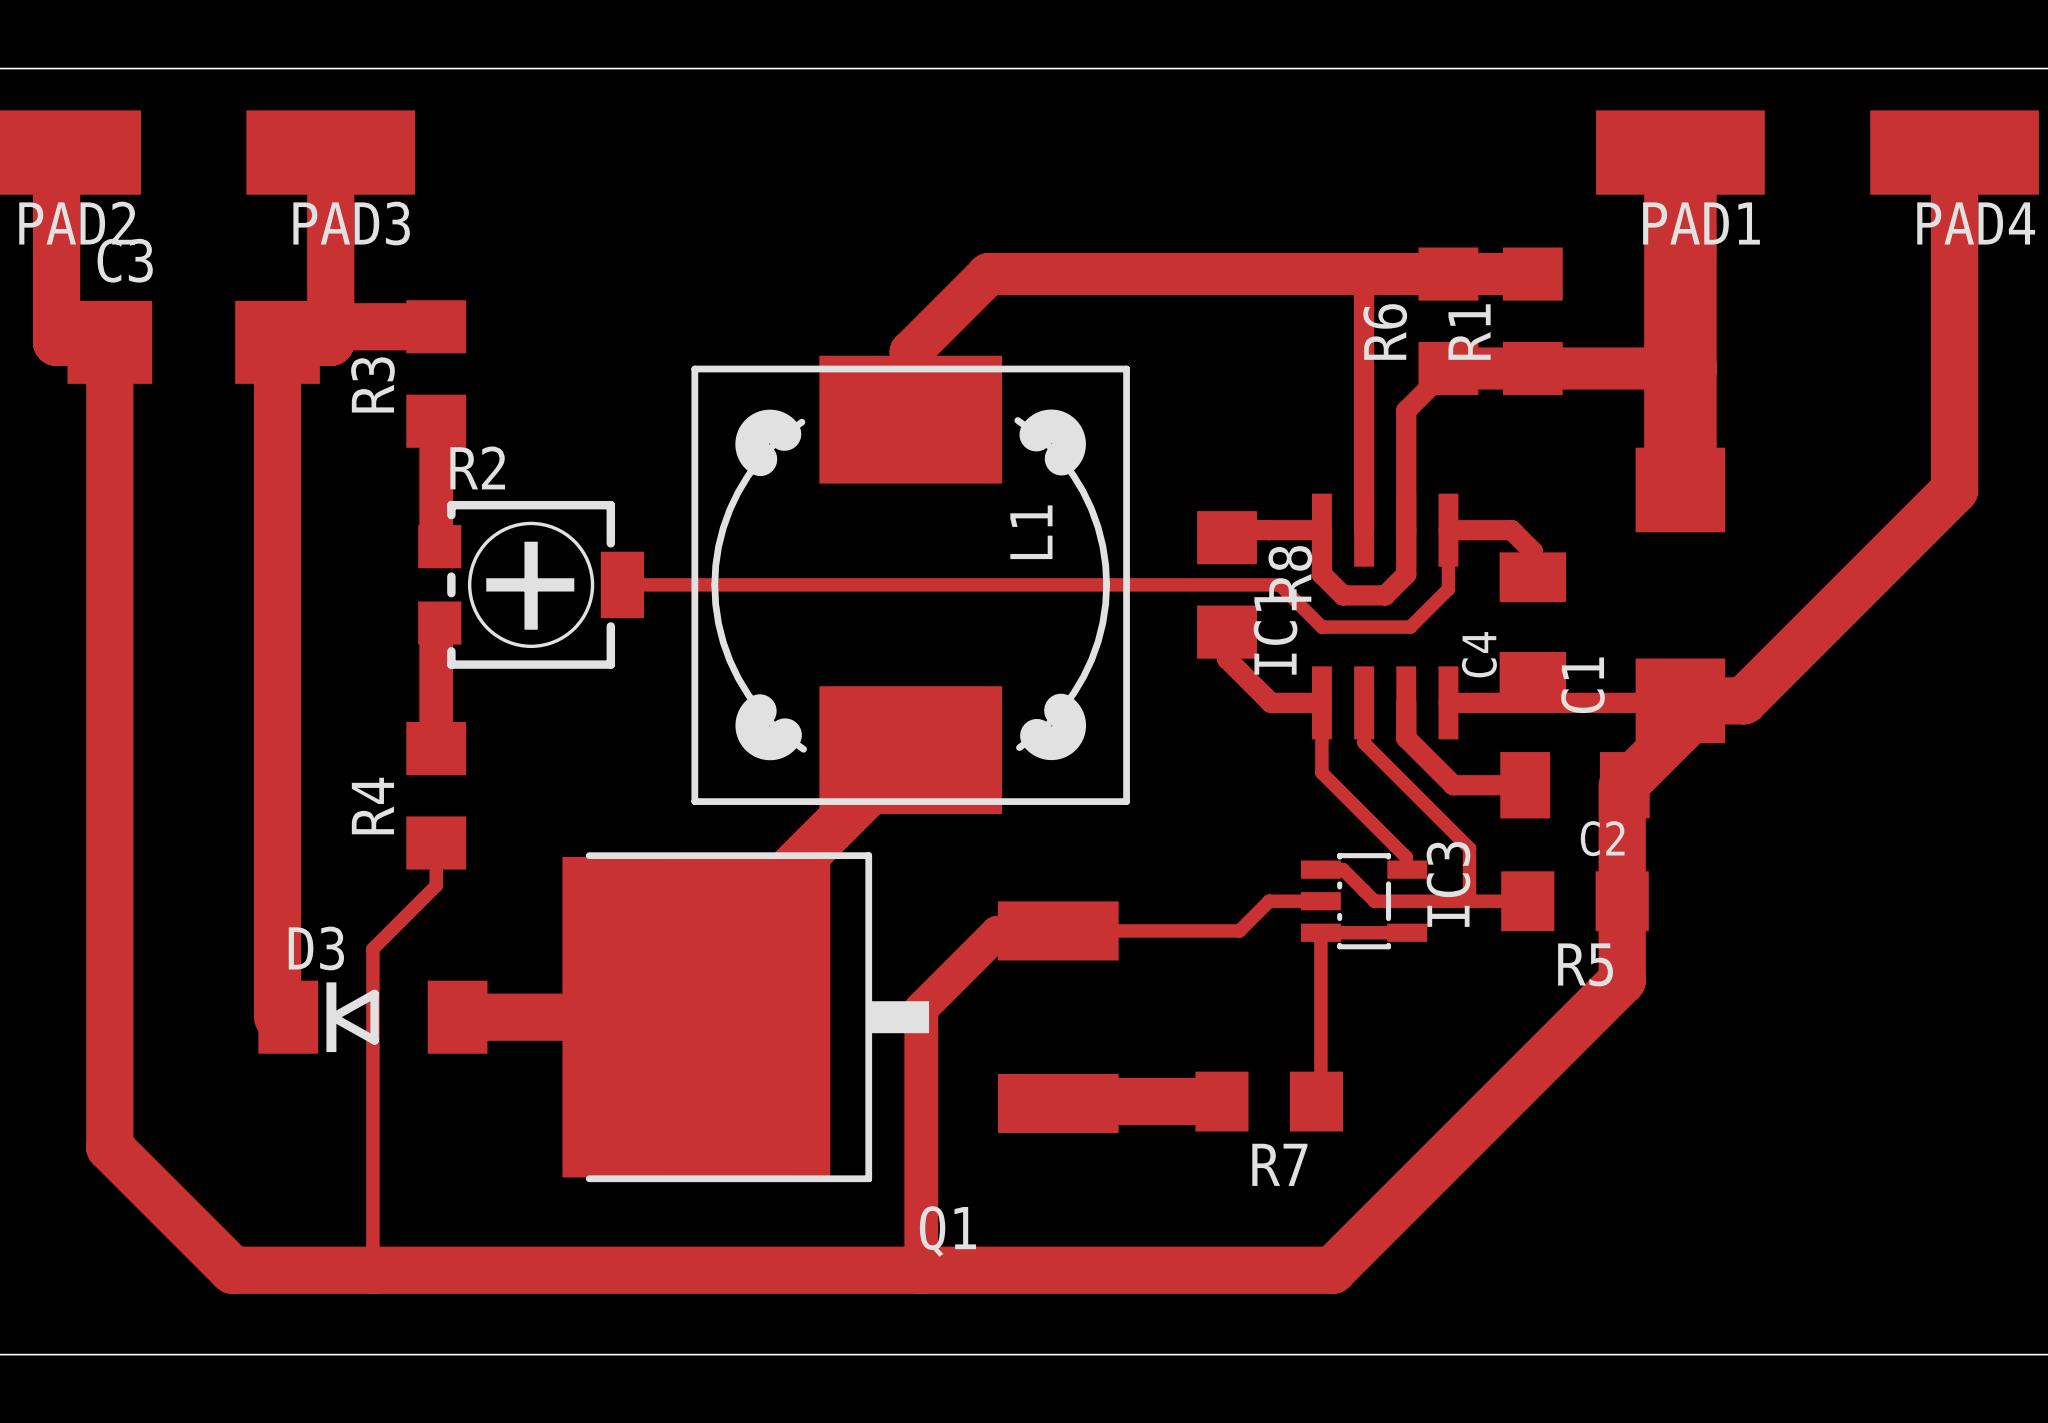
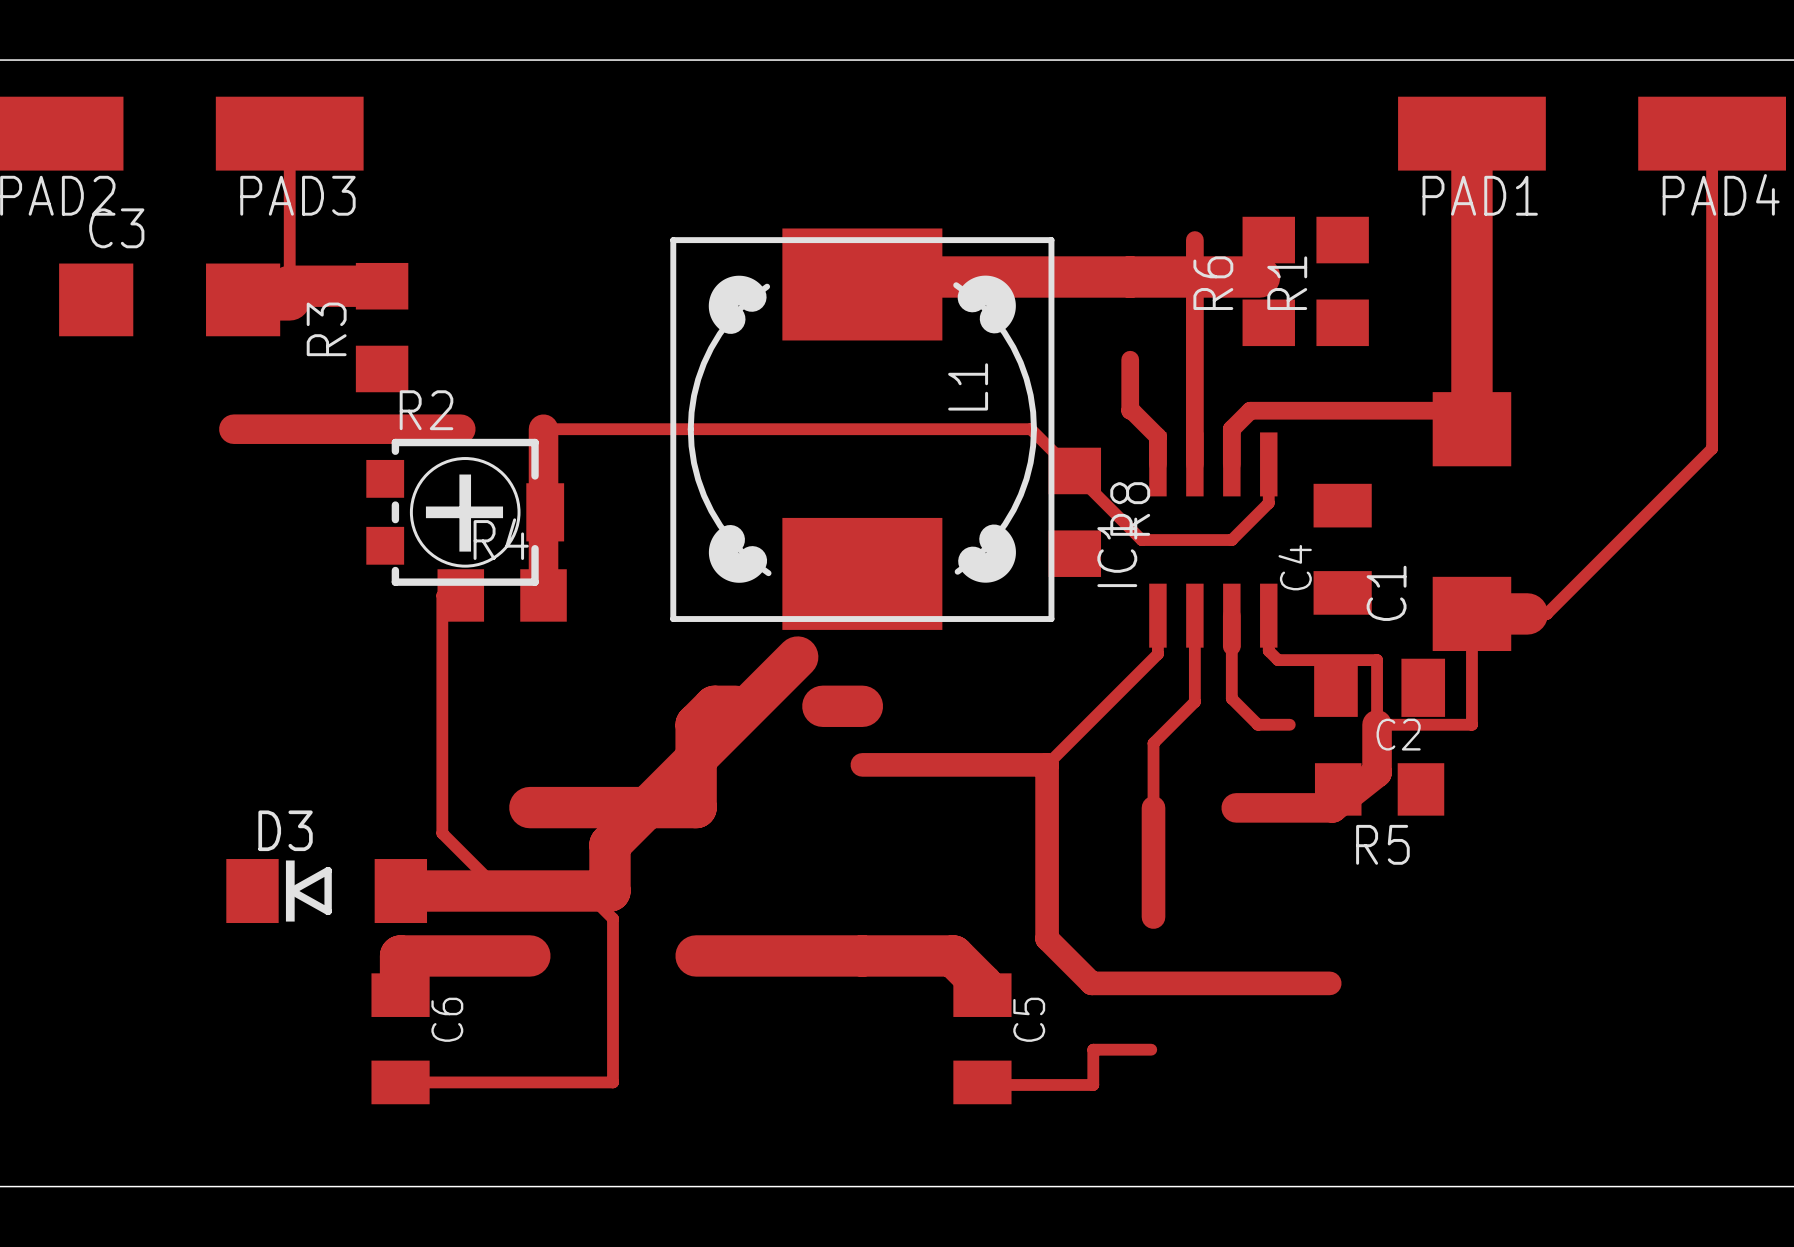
track: (56, 152) (56, 342) (109, 342) (109, 1147) (232, 1270) (1332, 1270) (1622, 980) (1622, 785) (1624, 785) (1680, 729) -> (1377, 724) (1471, 724) (1471, 639)
track width: thick (330, 152) (330, 342) -> thin (289, 133) (289, 299)
track width: thick (1680, 152) (1680, 489) -> thin (1471, 133) (1471, 429)
track width: thick (1954, 152) (1954, 489) -> thin (1712, 133) (1712, 429)
track: (1532, 274) (988, 274) (910, 351) (910, 419) -> none
track: none -> (1259, 277) (862, 277) (862, 284)
track: (277, 337) (277, 1017) (288, 1017) -> none
track: (1680, 368) (1448, 368) (1406, 410) (1406, 489) -> (1471, 410) (1250, 410) (1231, 429)
track: none -> (1130, 359) (1130, 410) (1157, 436) (1157, 464)
track: (436, 421) (436, 546) (439, 546) -> none
track: none -> (233, 429) (460, 429)
track: (1954, 489) (1743, 700) -> (1712, 429) (1712, 448) (1546, 613) (1527, 613)
track: (1406, 530) (1406, 574) (1385, 595) (1343, 595) (1321, 574) (1321, 530) (1227, 529) (1227, 537) -> none
track: (1448, 530) (1511, 530) (1532, 551) (1532, 577) -> none
track: (1448, 574) (1448, 589) (1410, 627) (1321, 627) (1279, 584) (622, 584) -> (1268, 503) (1231, 540) (1141, 540) (1030, 429) (543, 429) (543, 595)
L1 position: (910, 584) -> (862, 429)
track: (439, 623) (436, 623) (436, 748) -> none
track: (1227, 632) (1227, 658) (1271, 702) (1321, 702) -> none
track: none -> (460, 595) (442, 595) (442, 833) (490, 881) (576, 881) (612, 918) (612, 1082) (400, 1082)
track: (1680, 700) (1680, 702) (1448, 702) -> (1377, 724) (1377, 660) (1278, 660) (1268, 650) (1268, 615)
track: (1406, 738) (1453, 785) (1525, 785) -> (1231, 646) (1231, 698) (1257, 724) (1289, 724)
track: (1364, 743) (1469, 848) (1469, 901) -> (1194, 650) (1194, 701) (1153, 743) (1153, 917) (1151, 917)
track: (1321, 746) (1321, 772) (1406, 857) (1407, 869) -> (1157, 654) (1047, 764)
R4 rotation: 0° (436, 795) -> 90° clockwise (502, 595)
R4 position: (436, 795) -> (502, 595)
track: none -> (735, 706) (714, 706) (696, 724) (696, 807) (529, 807)
track: none -> (822, 706) (862, 706)
track: none -> (1377, 724) (1377, 772) (1332, 807) (1236, 807)
track: (436, 843) (436, 885) (372, 948) (372, 1270) -> none
track: none -> (862, 761) (862, 764) (1047, 764)
track: (1320, 869) (1343, 869) (1374, 901) (1527, 901) -> none
track: none -> (1047, 764) (1047, 938) (1091, 983) (1329, 983)
track: (1320, 901) (1269, 901) (1239, 930) (997, 932) (921, 1008) (921, 1270) -> none
IC3: (1364, 901) -> none
track: (1407, 932) (1320, 932) (1320, 1112) (1316, 1101) -> none
Q1: (840, 1017) -> none
track: none -> (529, 955) (400, 955) (400, 995)
track: none -> (696, 955) (953, 955) (982, 985) (982, 995)
track: (1221, 1101) (1079, 1101) (1058, 1103) -> none
R7: (1269, 1101) -> none
C6: none -> (400, 1038)
C5: none -> (982, 1038)
track: none -> (1151, 1049) (1093, 1049) (1093, 1084) (982, 1084) (982, 1082)

